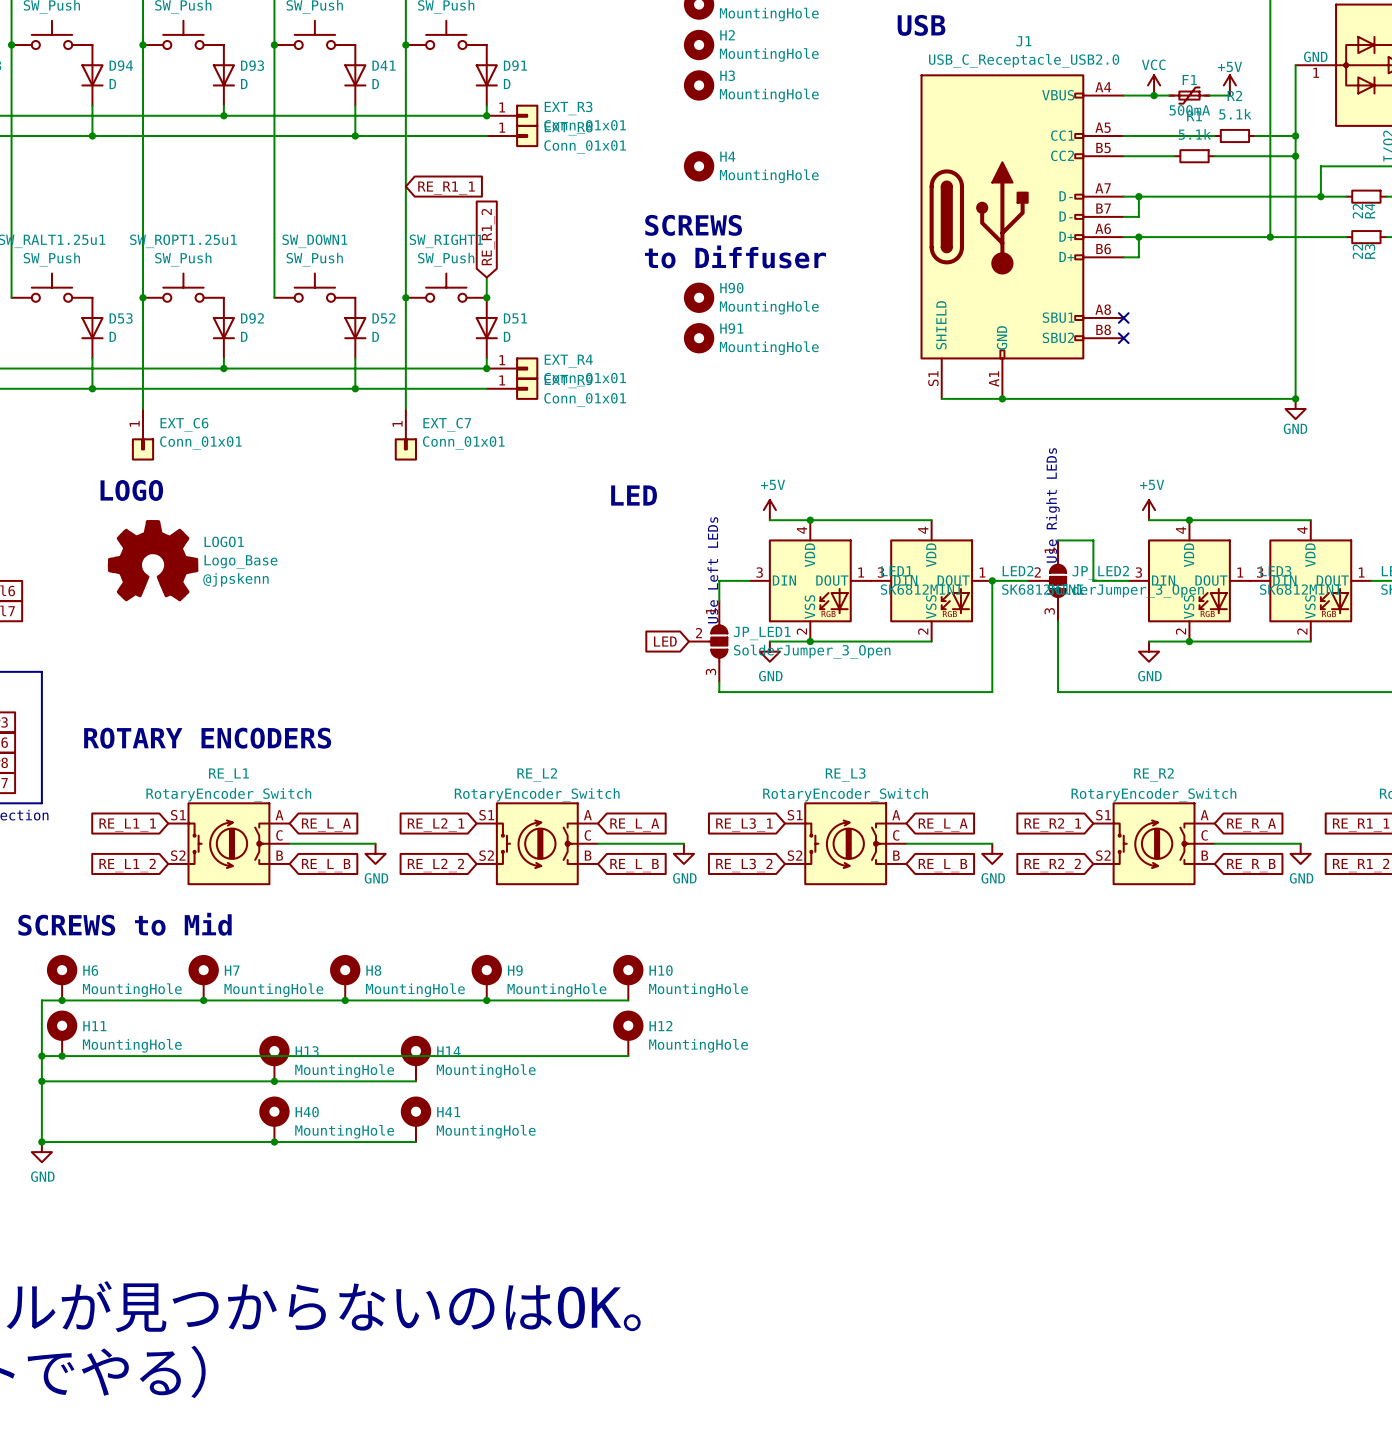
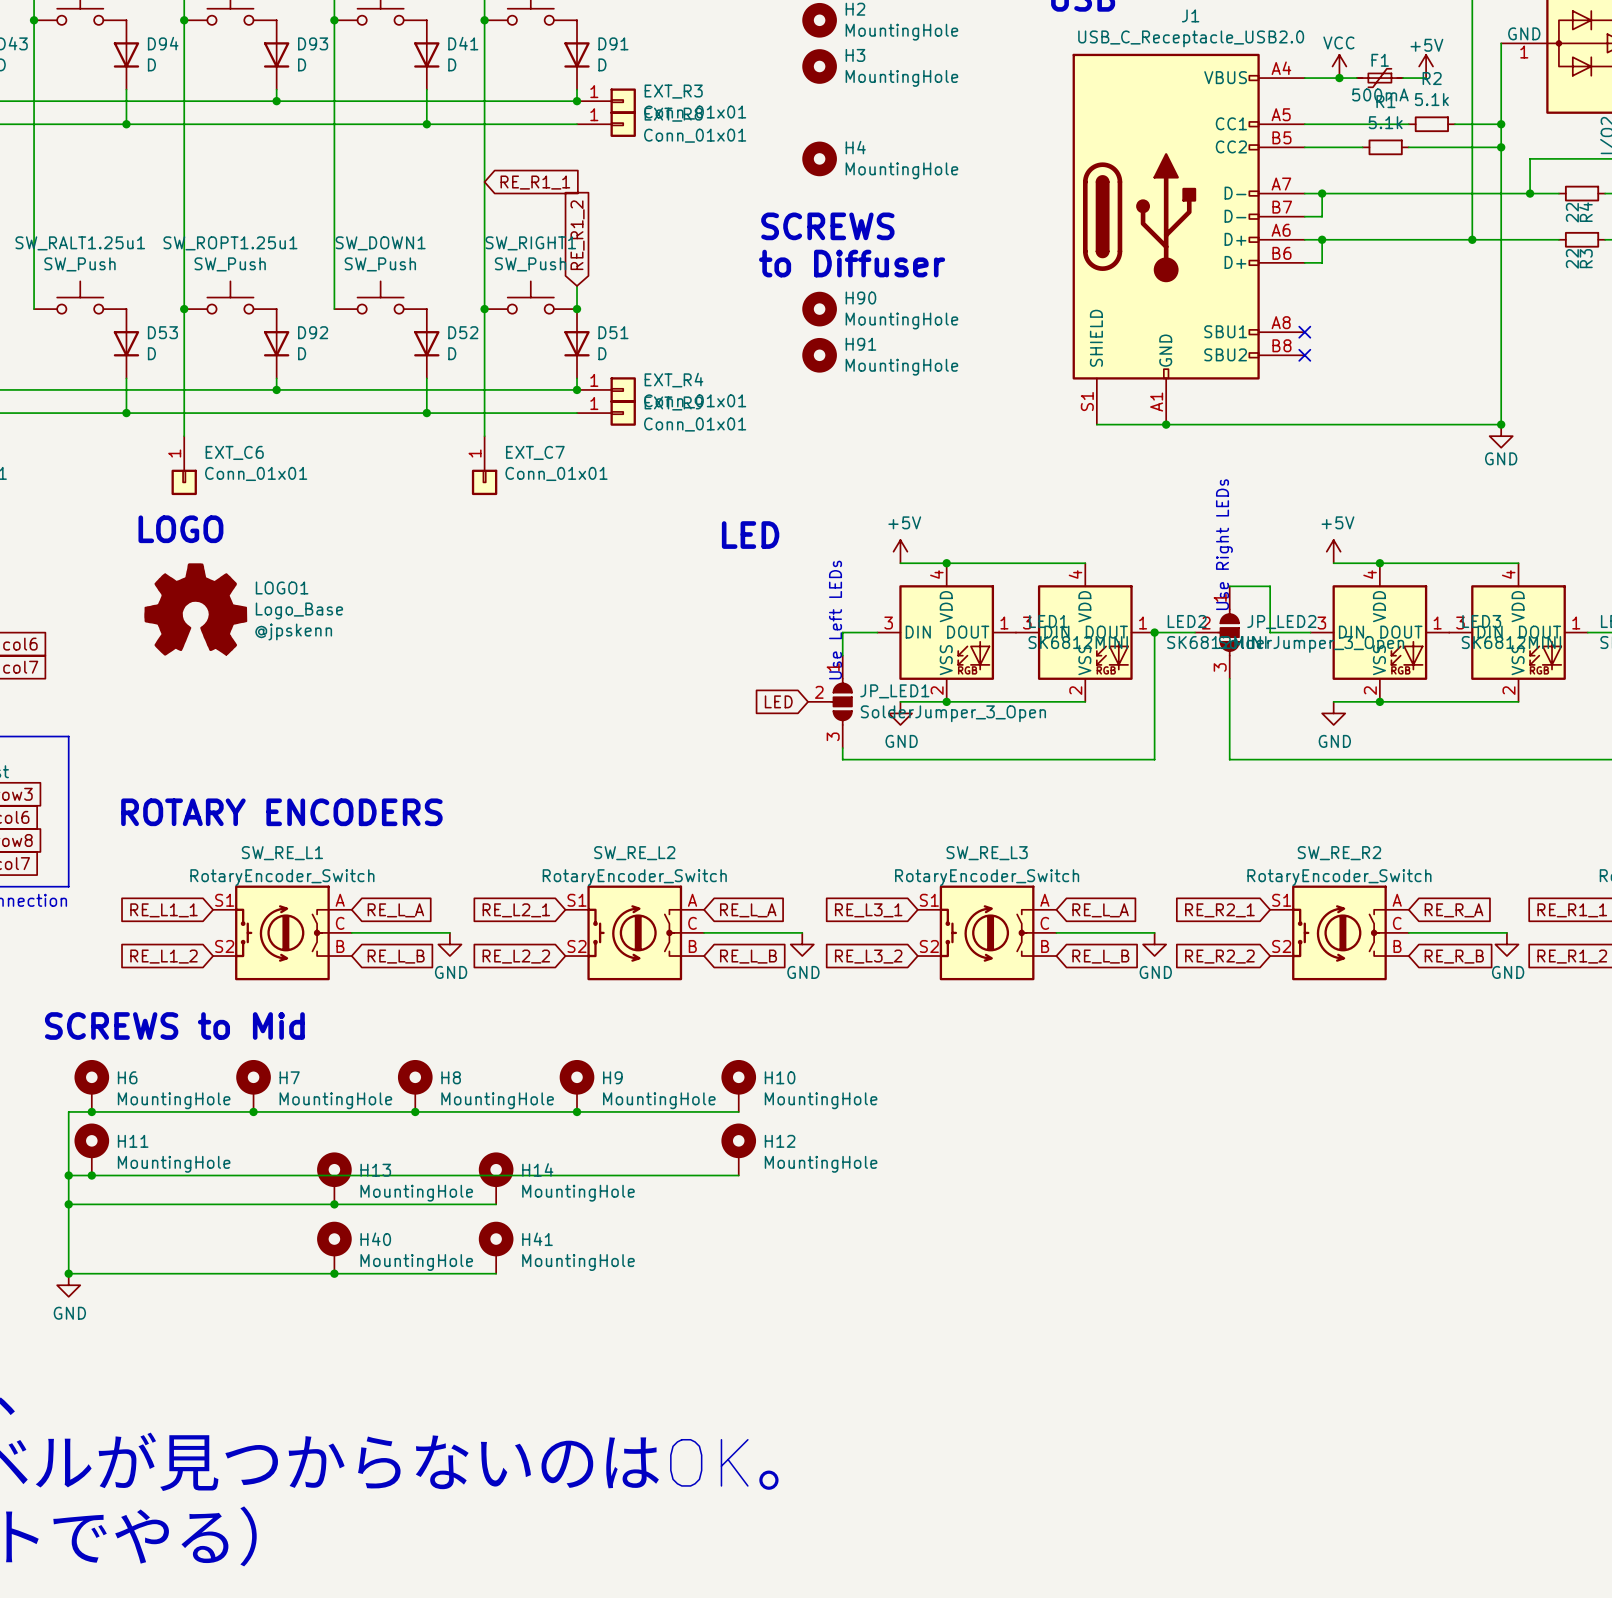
RE_L1 name: RE_L1 (228, 775) -> SW_RE_L1 (282, 853)
RE_L2 name: RE_L2 (537, 775) -> SW_RE_L2 (634, 853)
RE_L3 name: RE_L3 (845, 775) -> SW_RE_L3 (987, 853)
RE_R2 name: RE_R2 (1153, 775) -> SW_RE_R2 (1339, 853)

